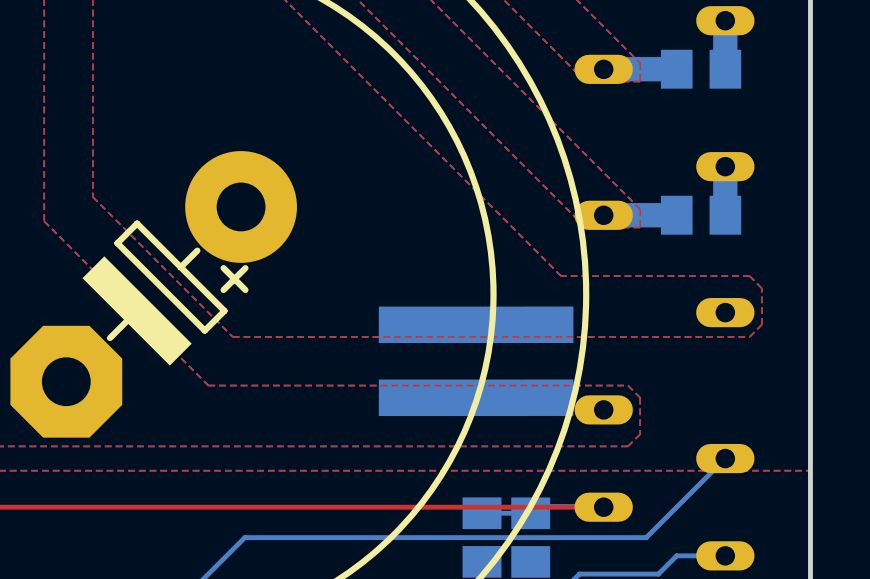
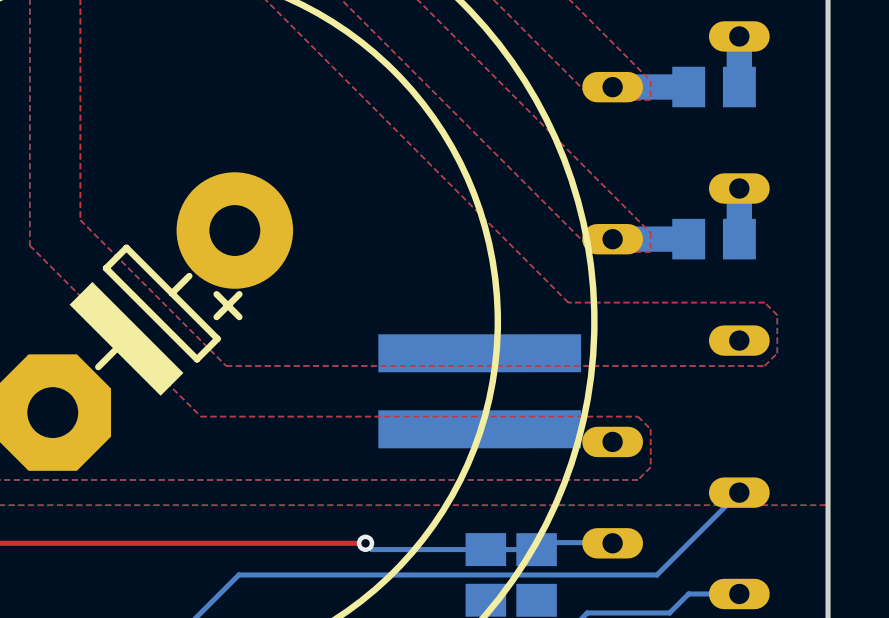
bottom track: none -> (365, 543) (371, 549) (485, 549)
top track: (366, 507) (604, 507) -> none
via: none -> (365, 543)

